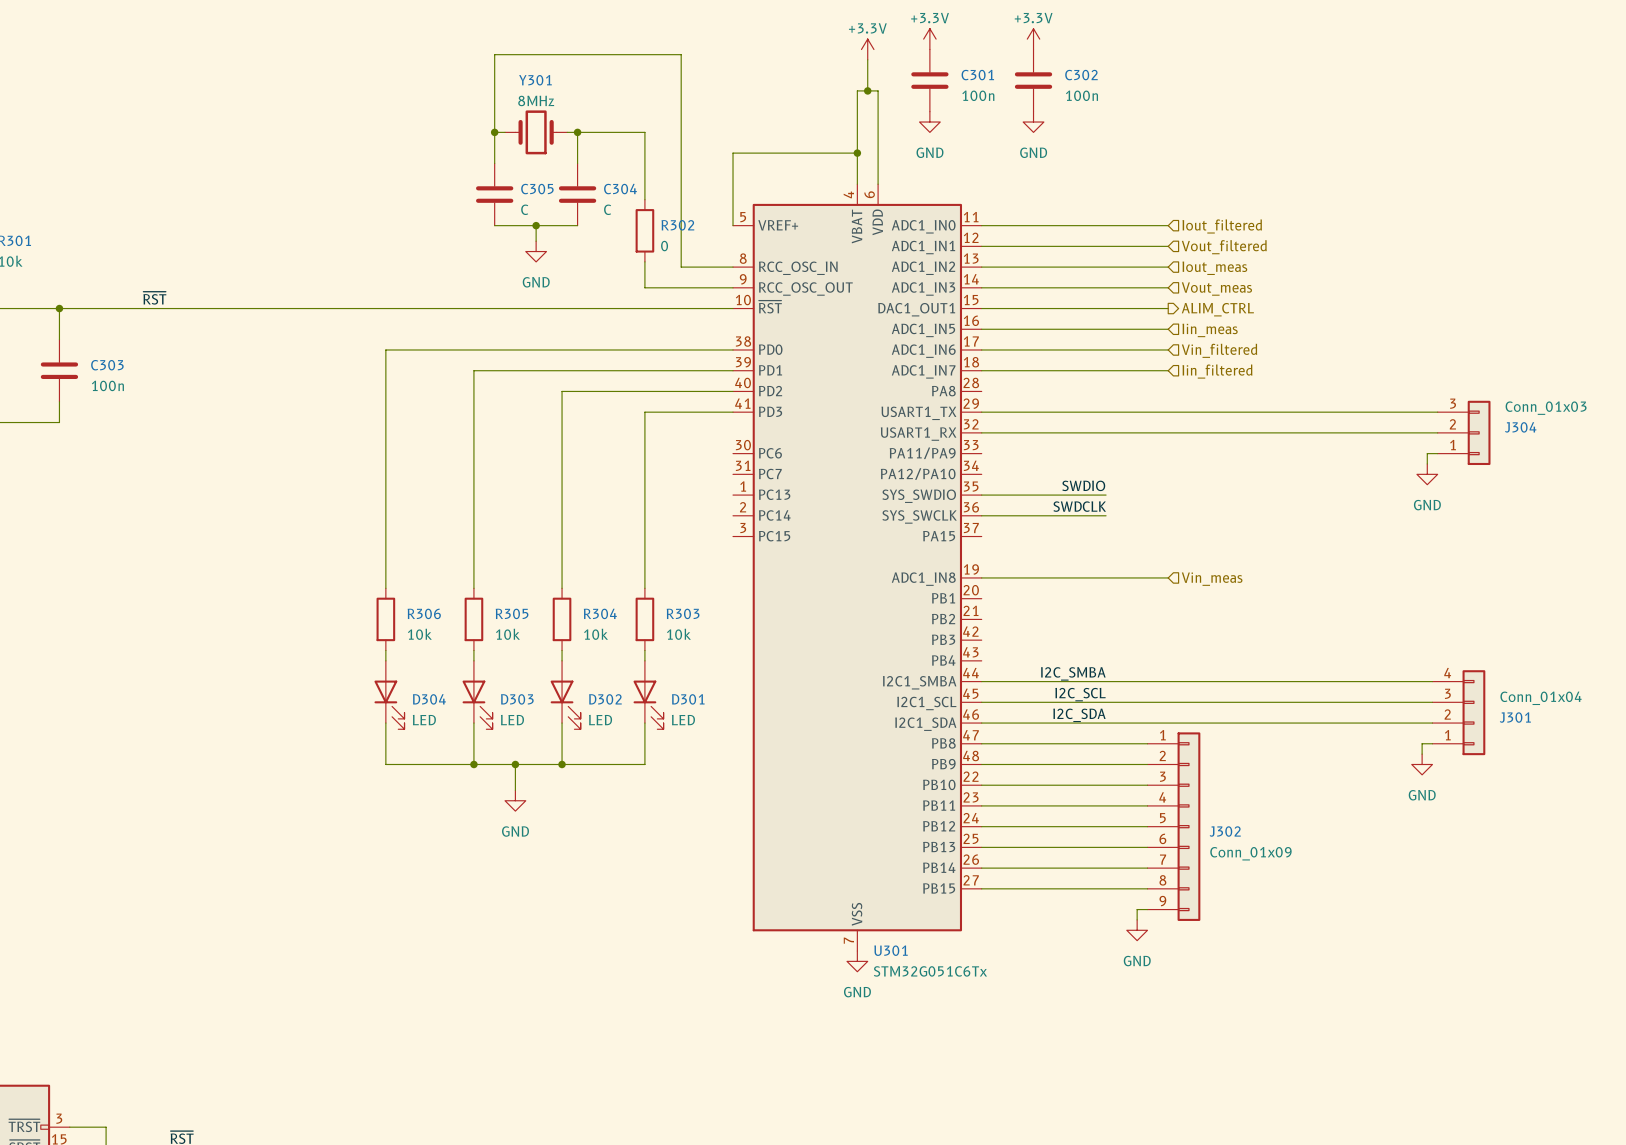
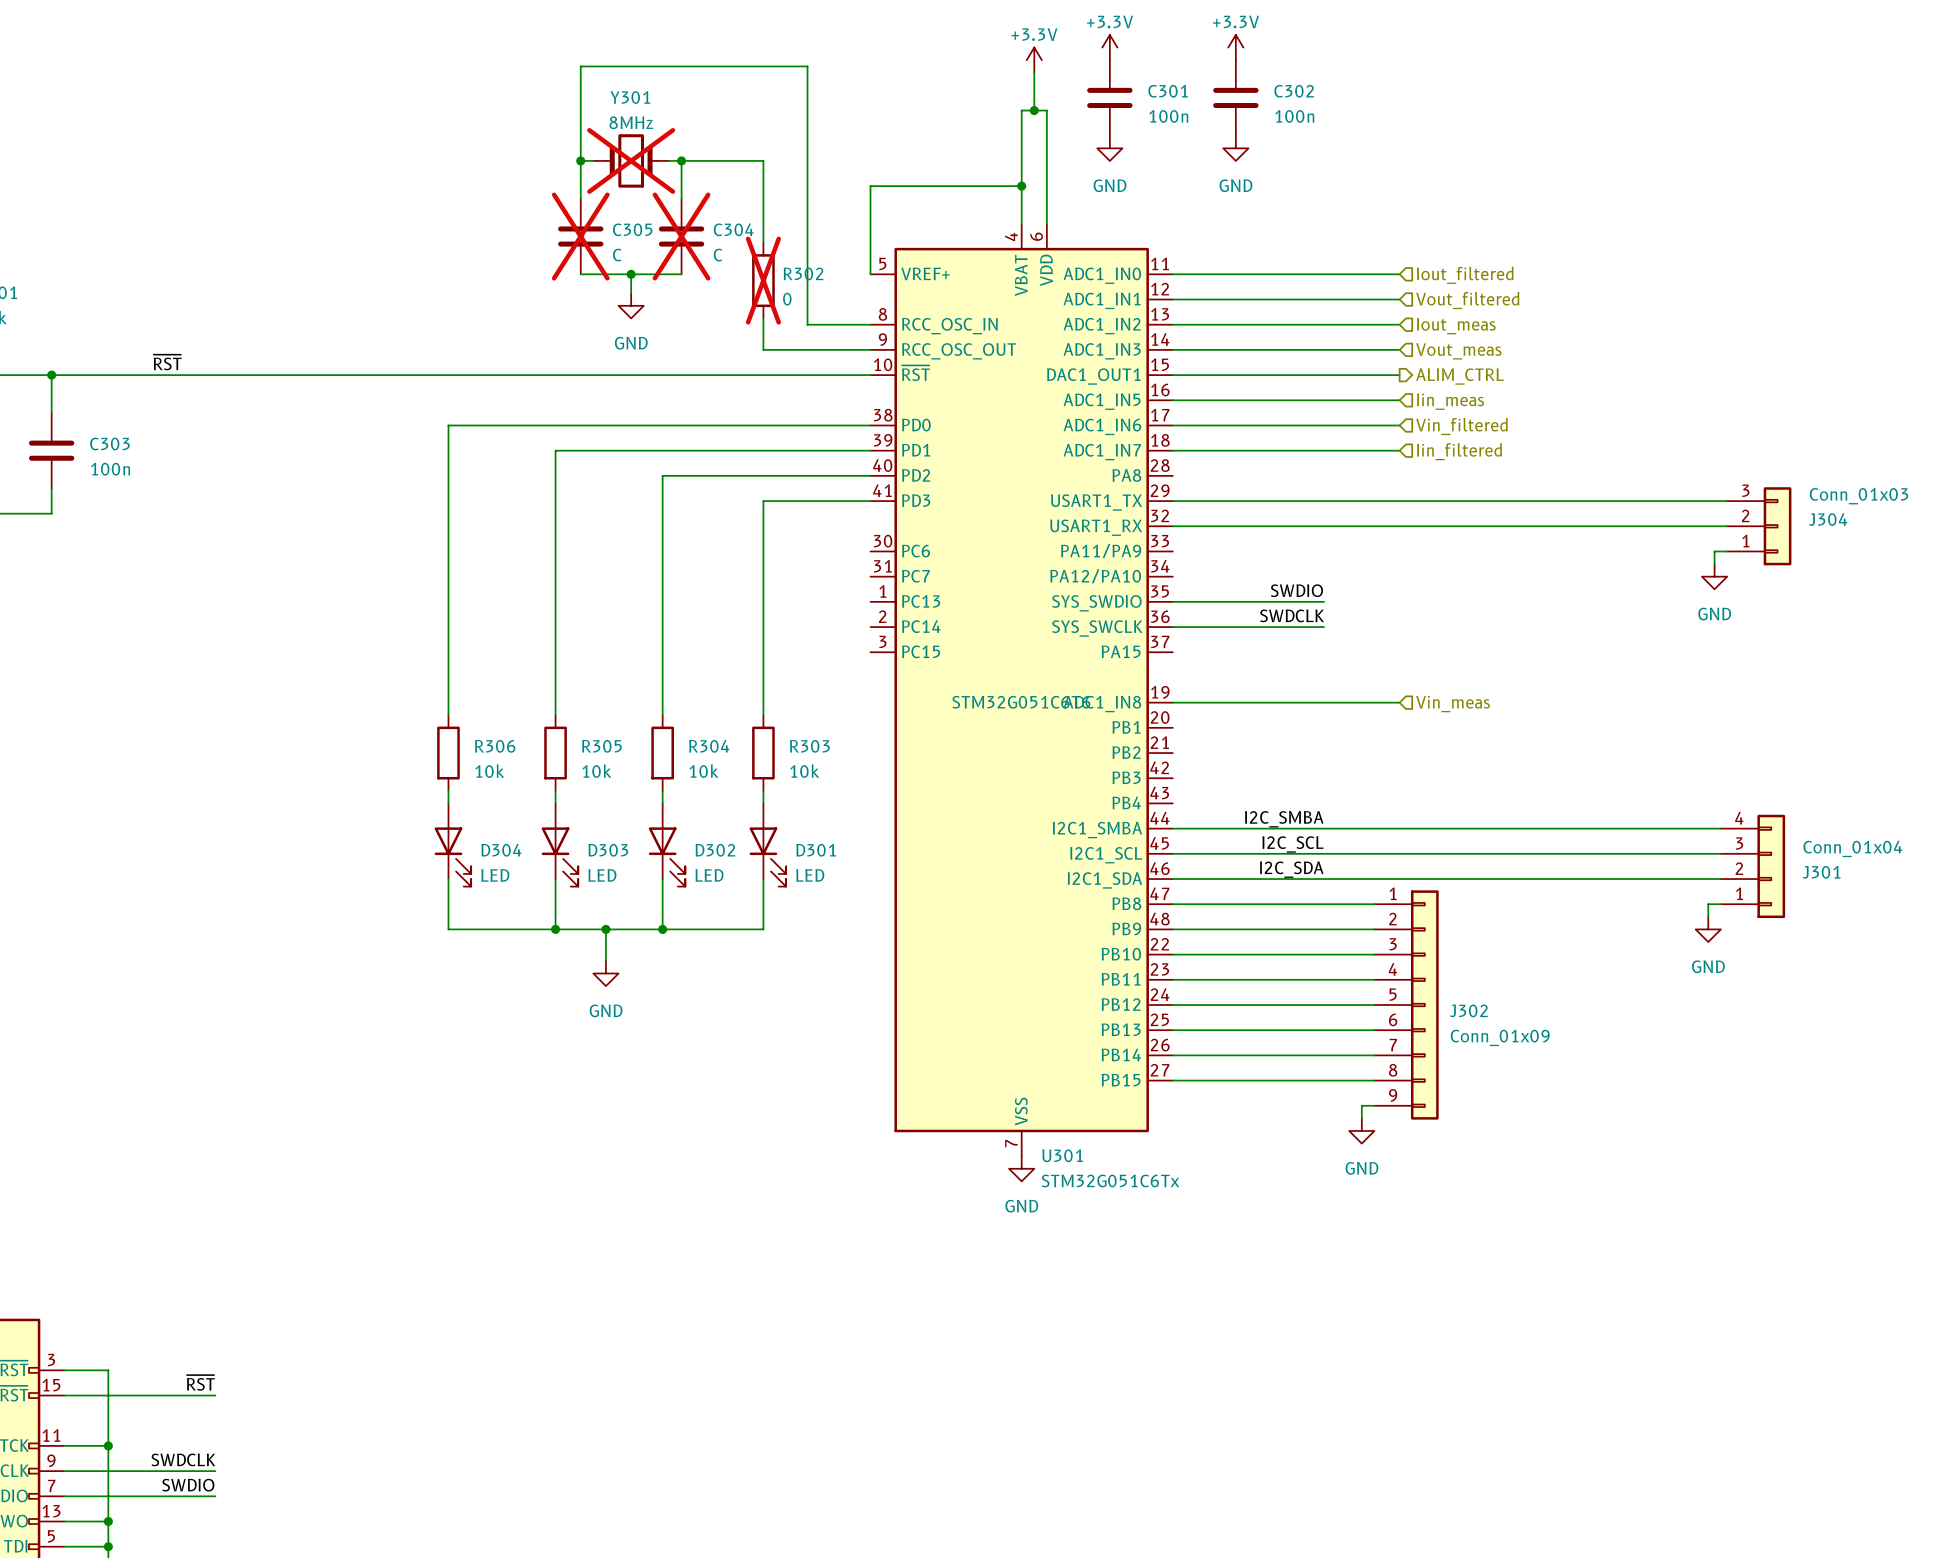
Y301 do-not-place cross: none -> (631, 160)
C305 do-not-place cross: none -> (580, 236)
C304 do-not-place cross: none -> (681, 236)
R302 do-not-place cross: none -> (763, 280)
U301 text: none -> STM32G051C6T6 (1021, 702)

